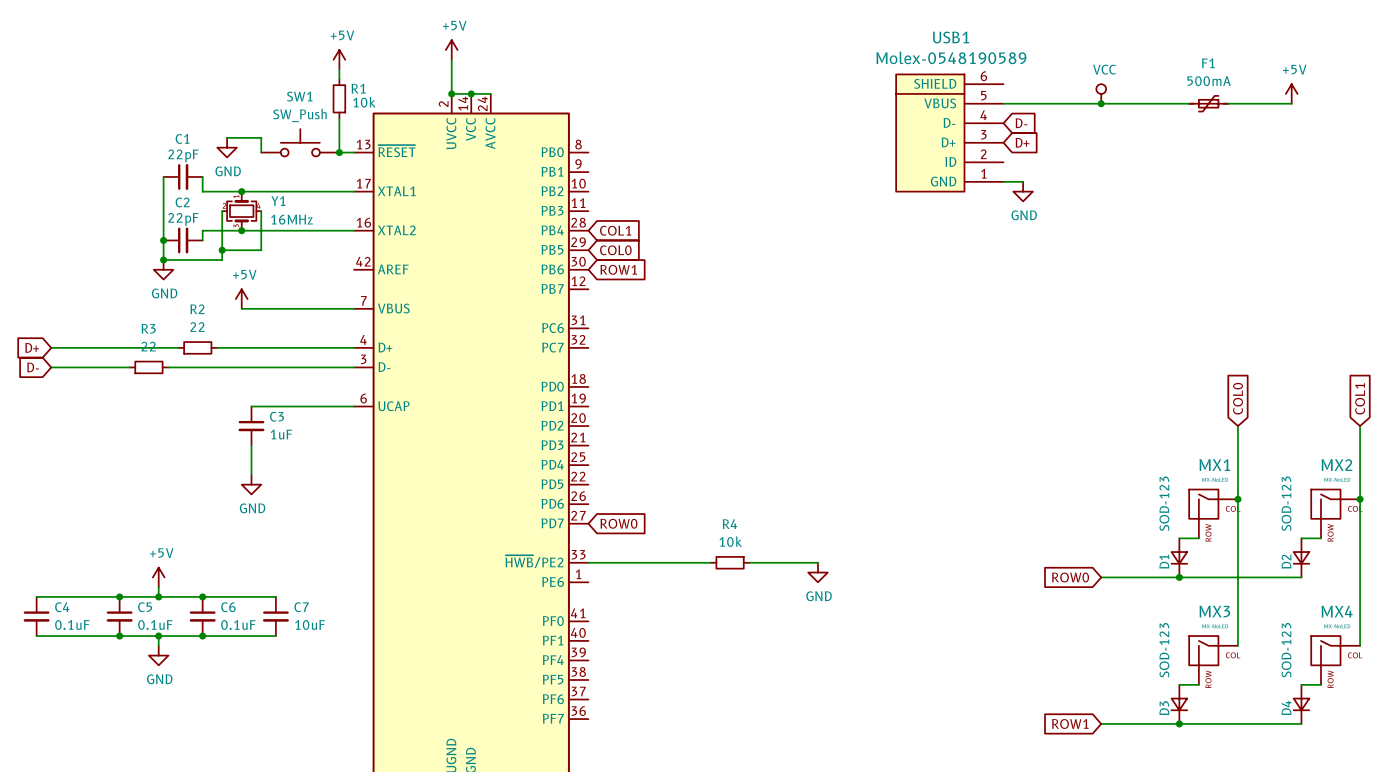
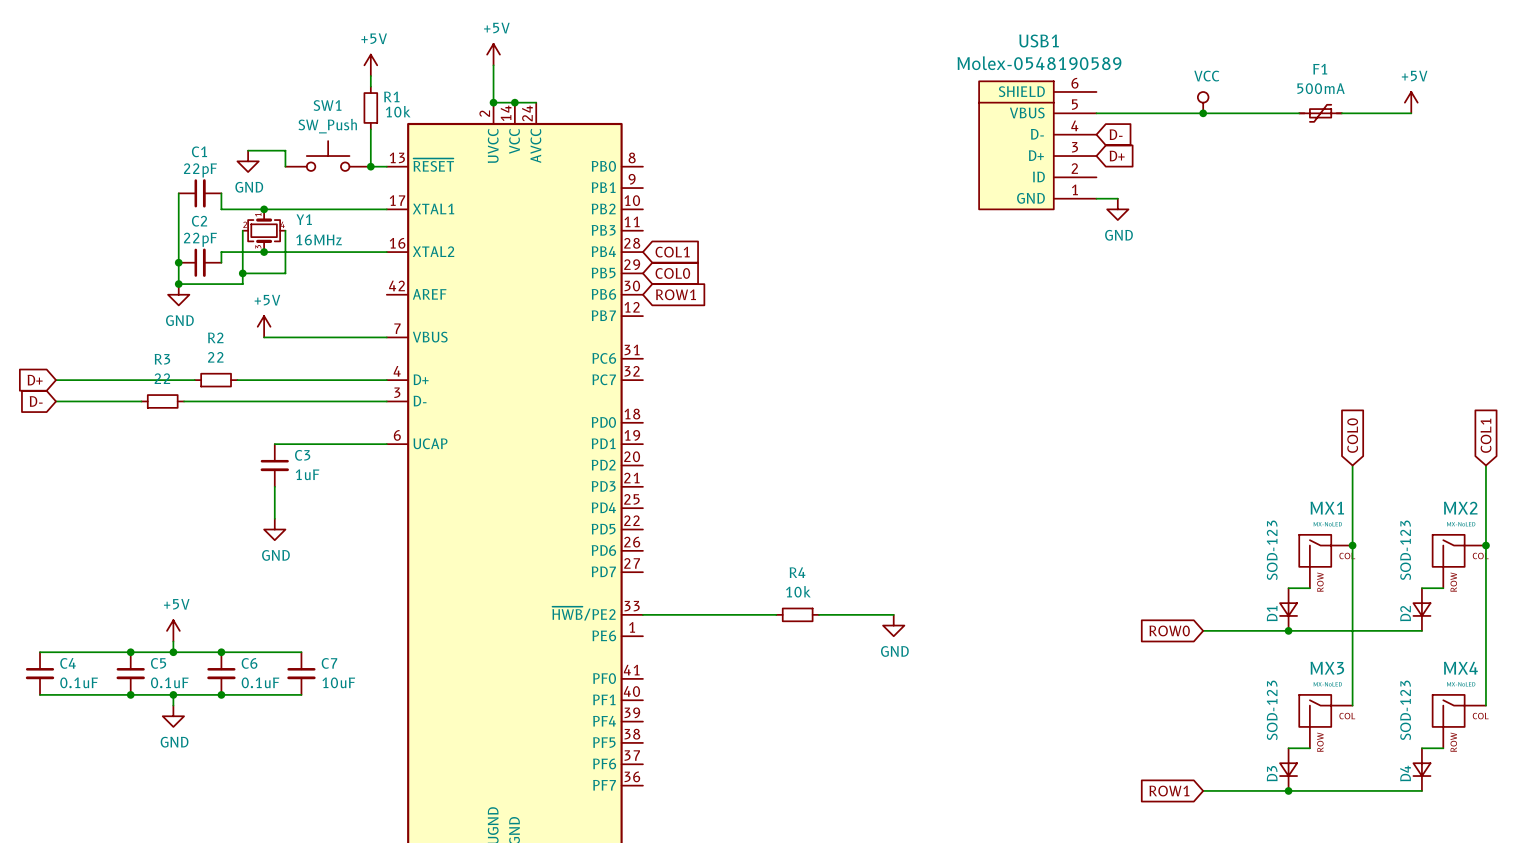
global label: ROW0 (618, 523) -> none

